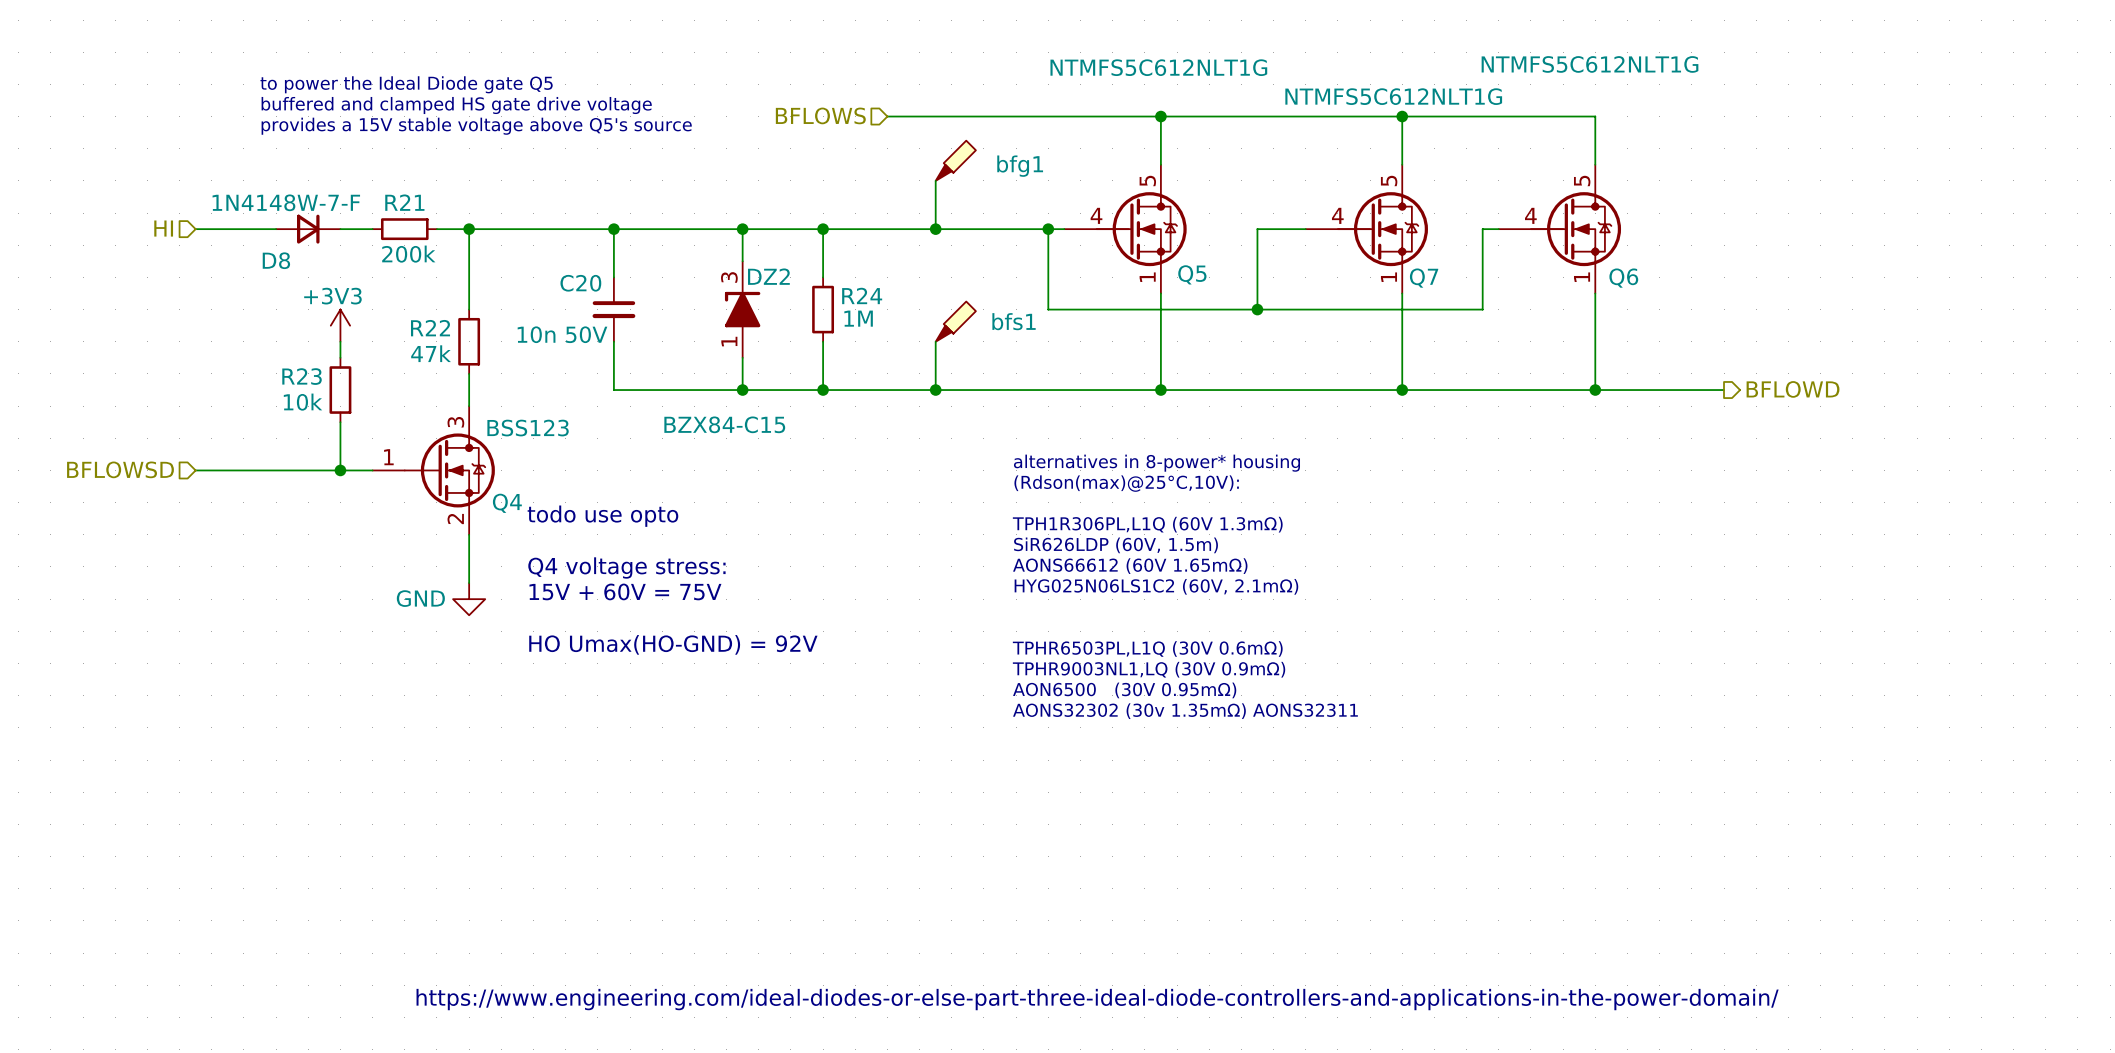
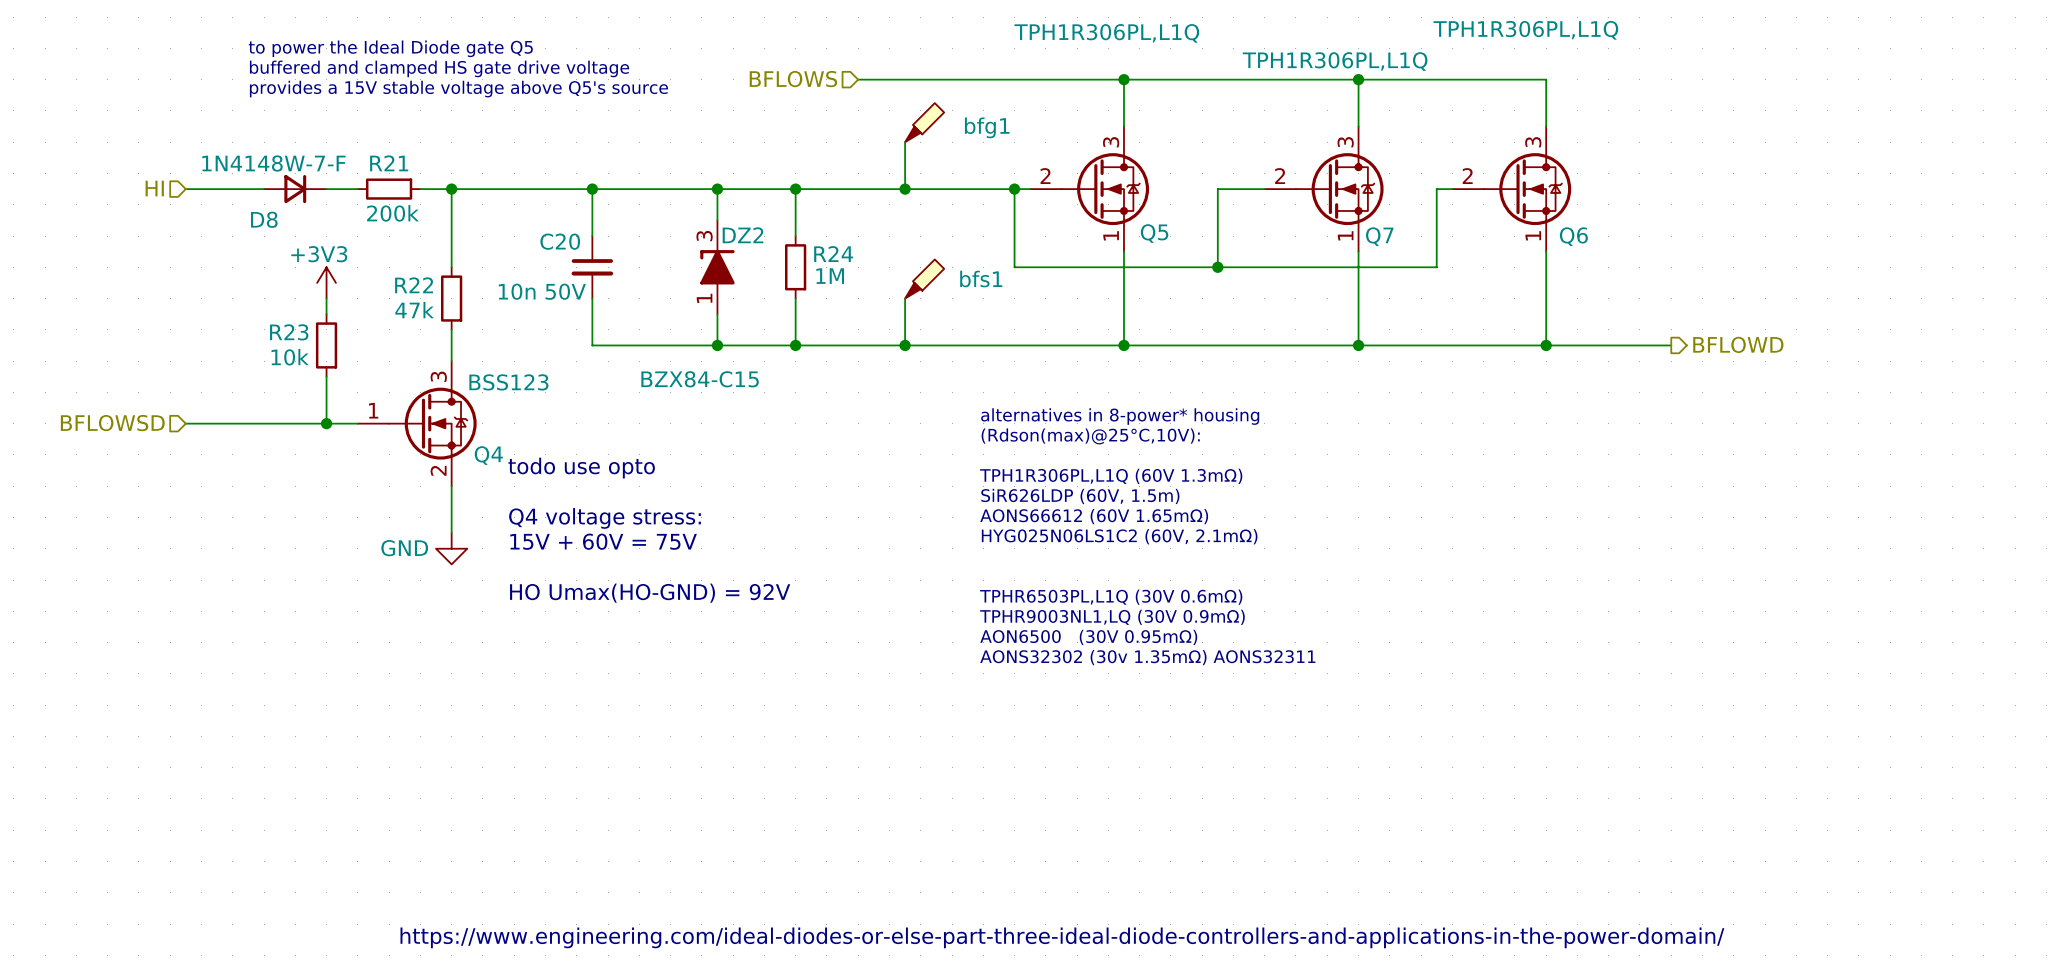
Q6 value: NTMFS5C612NLT1G (1590, 64) -> TPH1R306PL,L1Q (1525, 30)
Q5 value: NTMFS5C612NLT1G (1158, 67) -> TPH1R306PL,L1Q (1106, 33)
Q7 value: NTMFS5C612NLT1G (1393, 96) -> TPH1R306PL,L1Q (1335, 61)
Q5 symbol: [1064, 164, 1187, 294] -> [1030, 126, 1150, 252]
Q7 symbol: [1305, 164, 1428, 294] -> [1264, 126, 1384, 252]
Q6 symbol: [1498, 164, 1622, 294] -> [1452, 126, 1572, 252]

